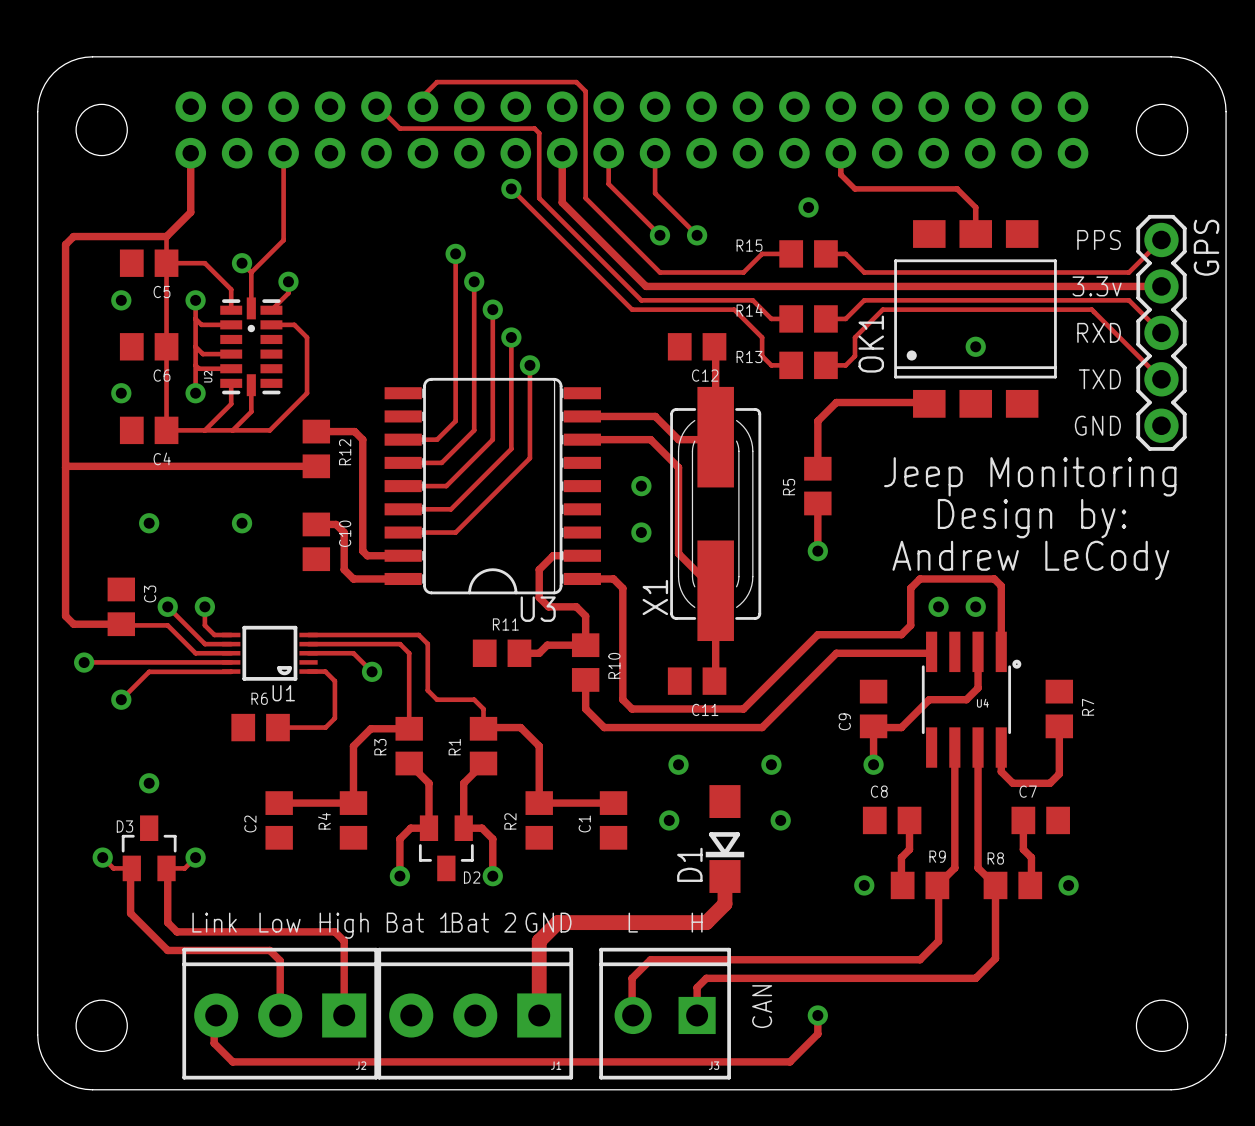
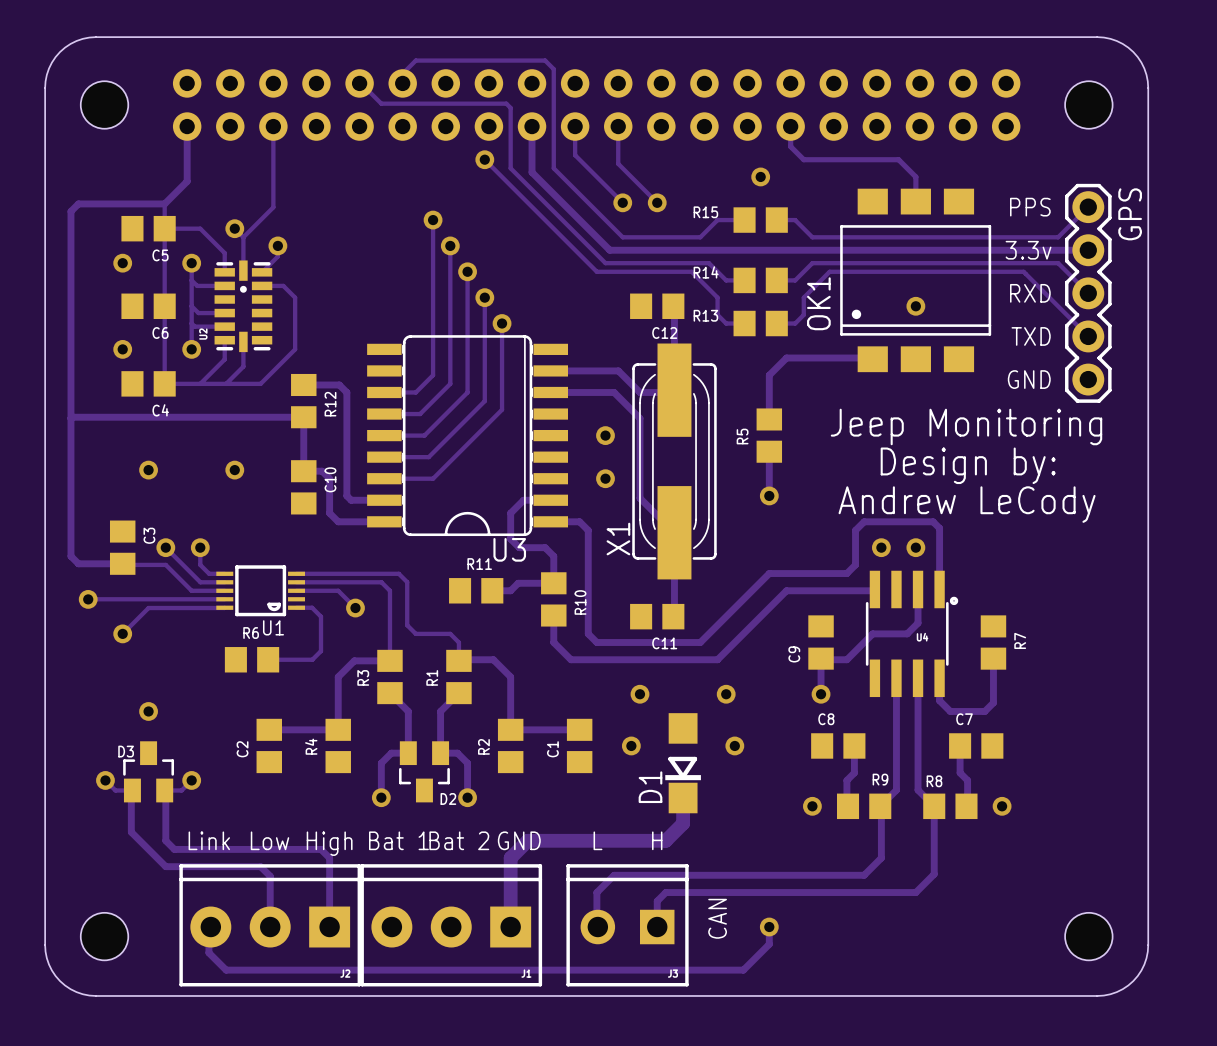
track: none -> (303, 417) (303, 471)

